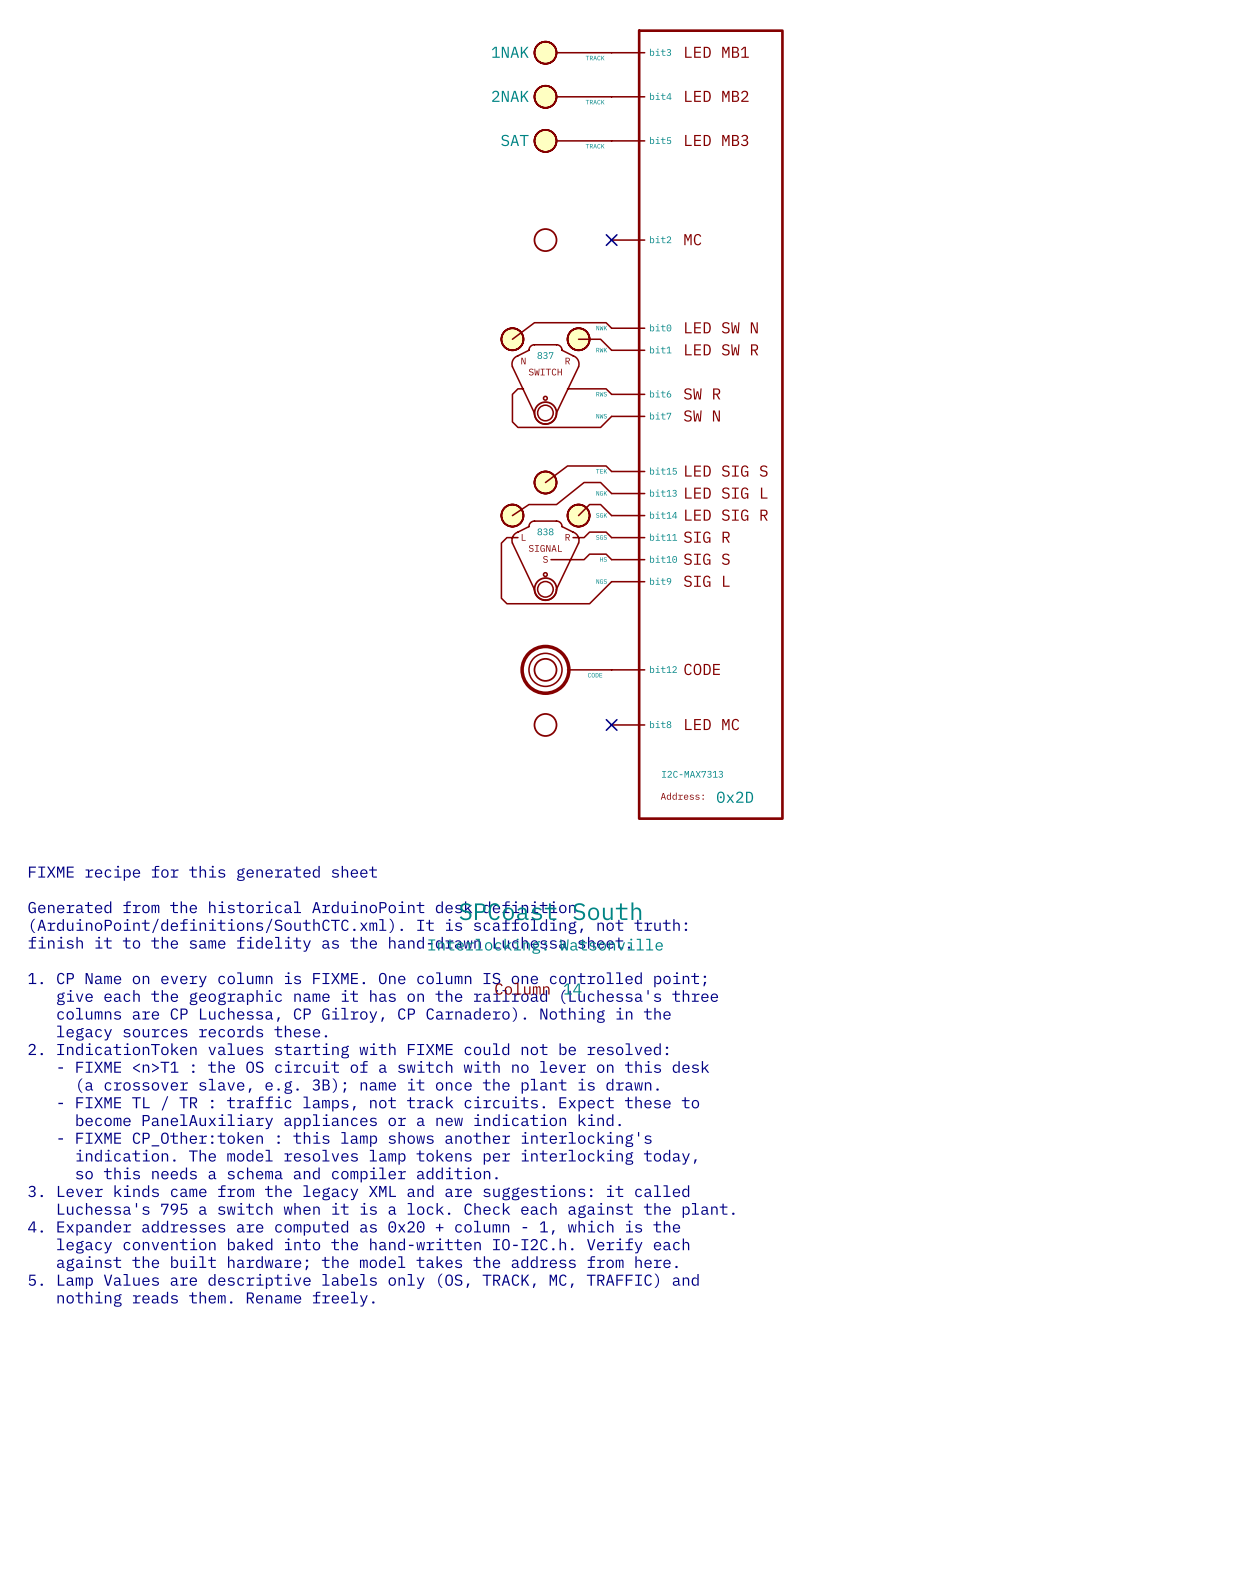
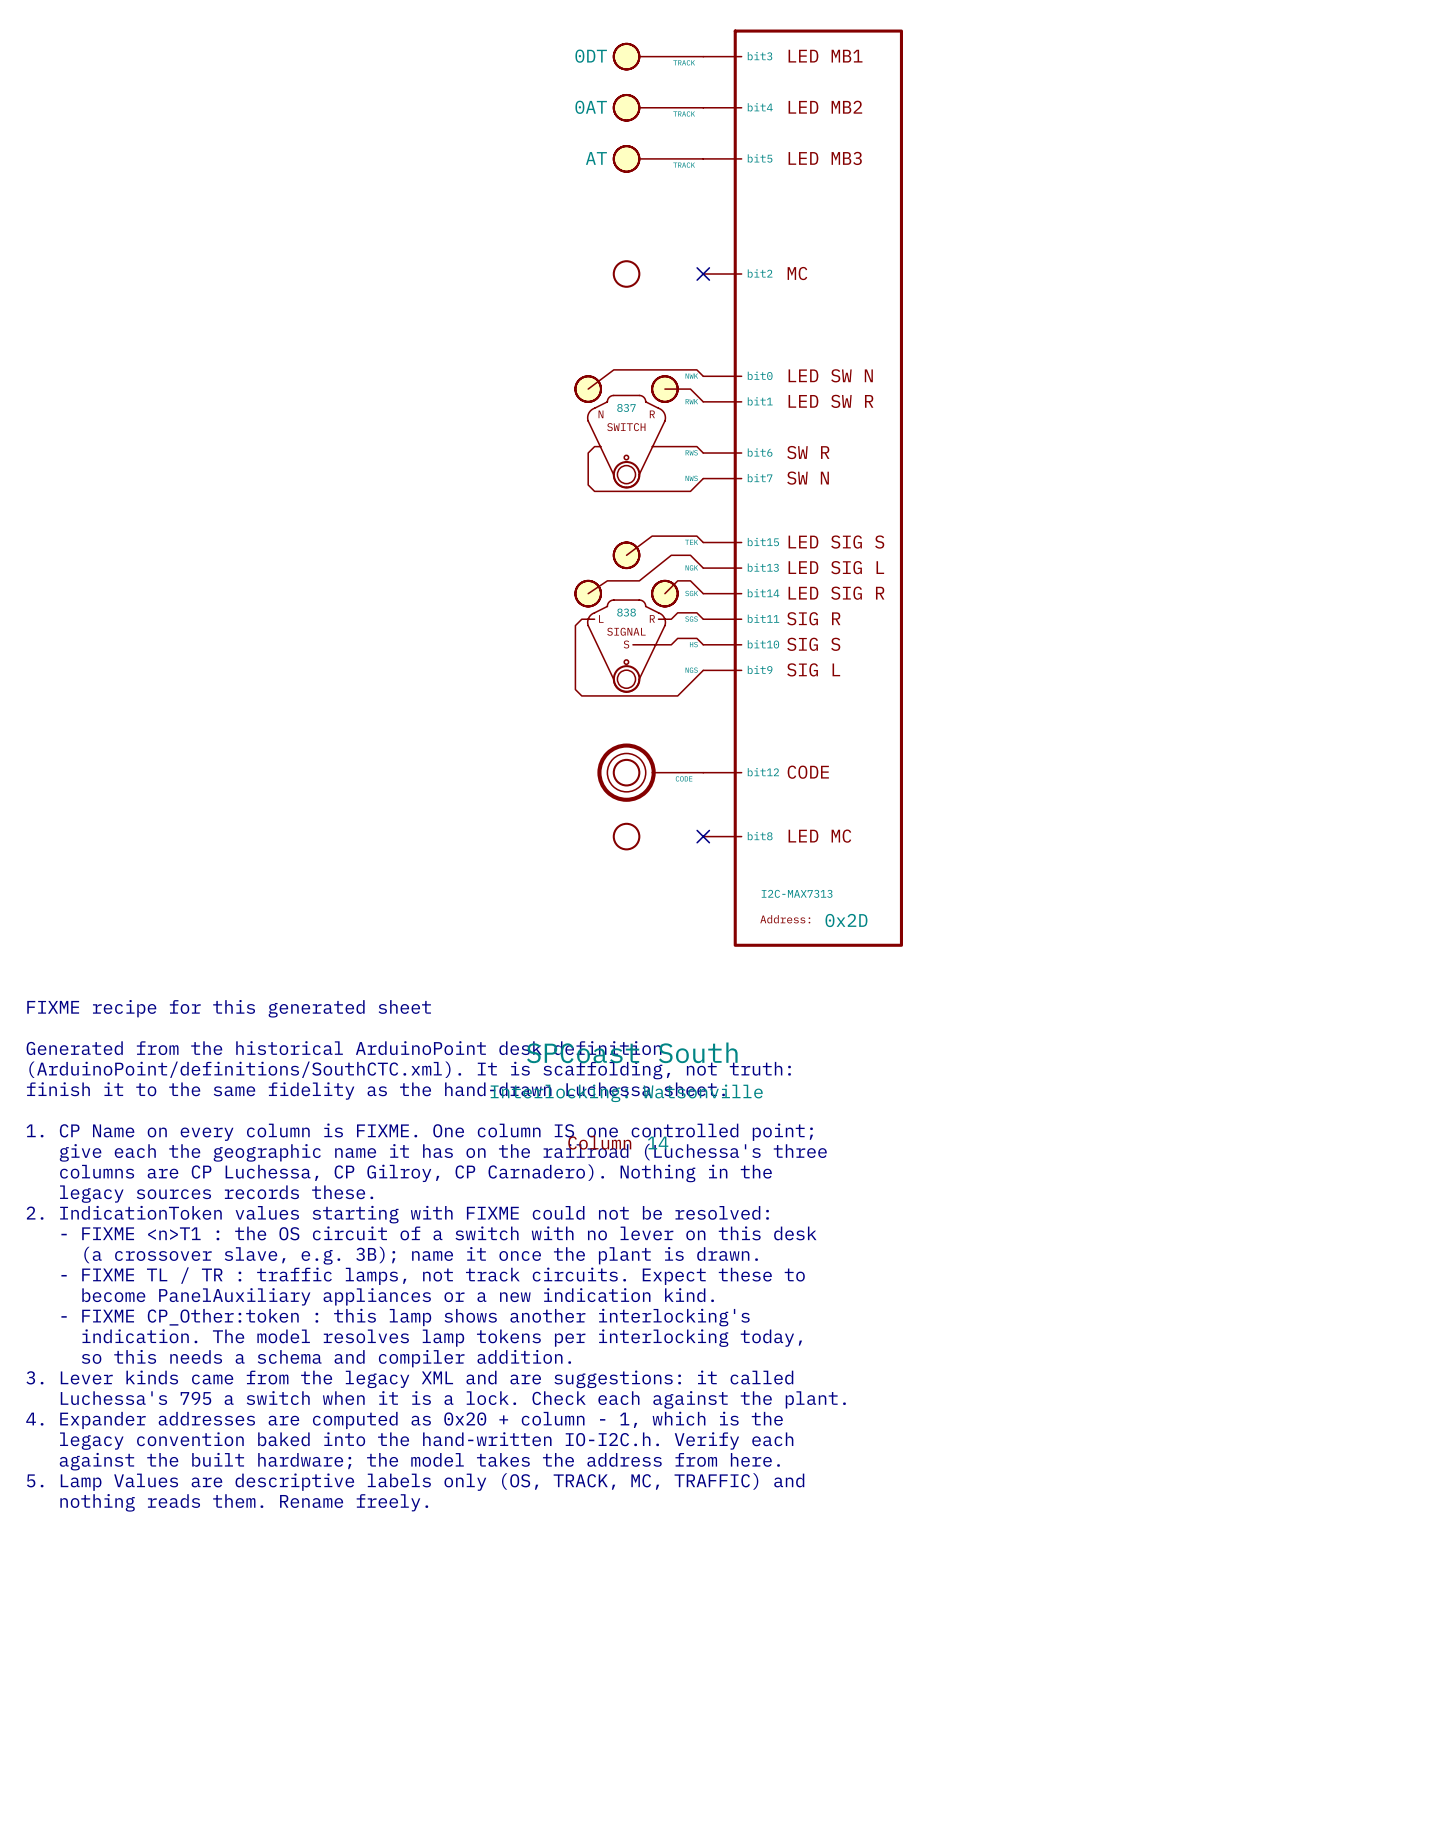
part text: 1NAK (510, 52) -> 0DT (591, 56)
part text: 2NAK (510, 96) -> 0AT (591, 107)
part text: SAT (514, 140) -> AT (596, 158)

